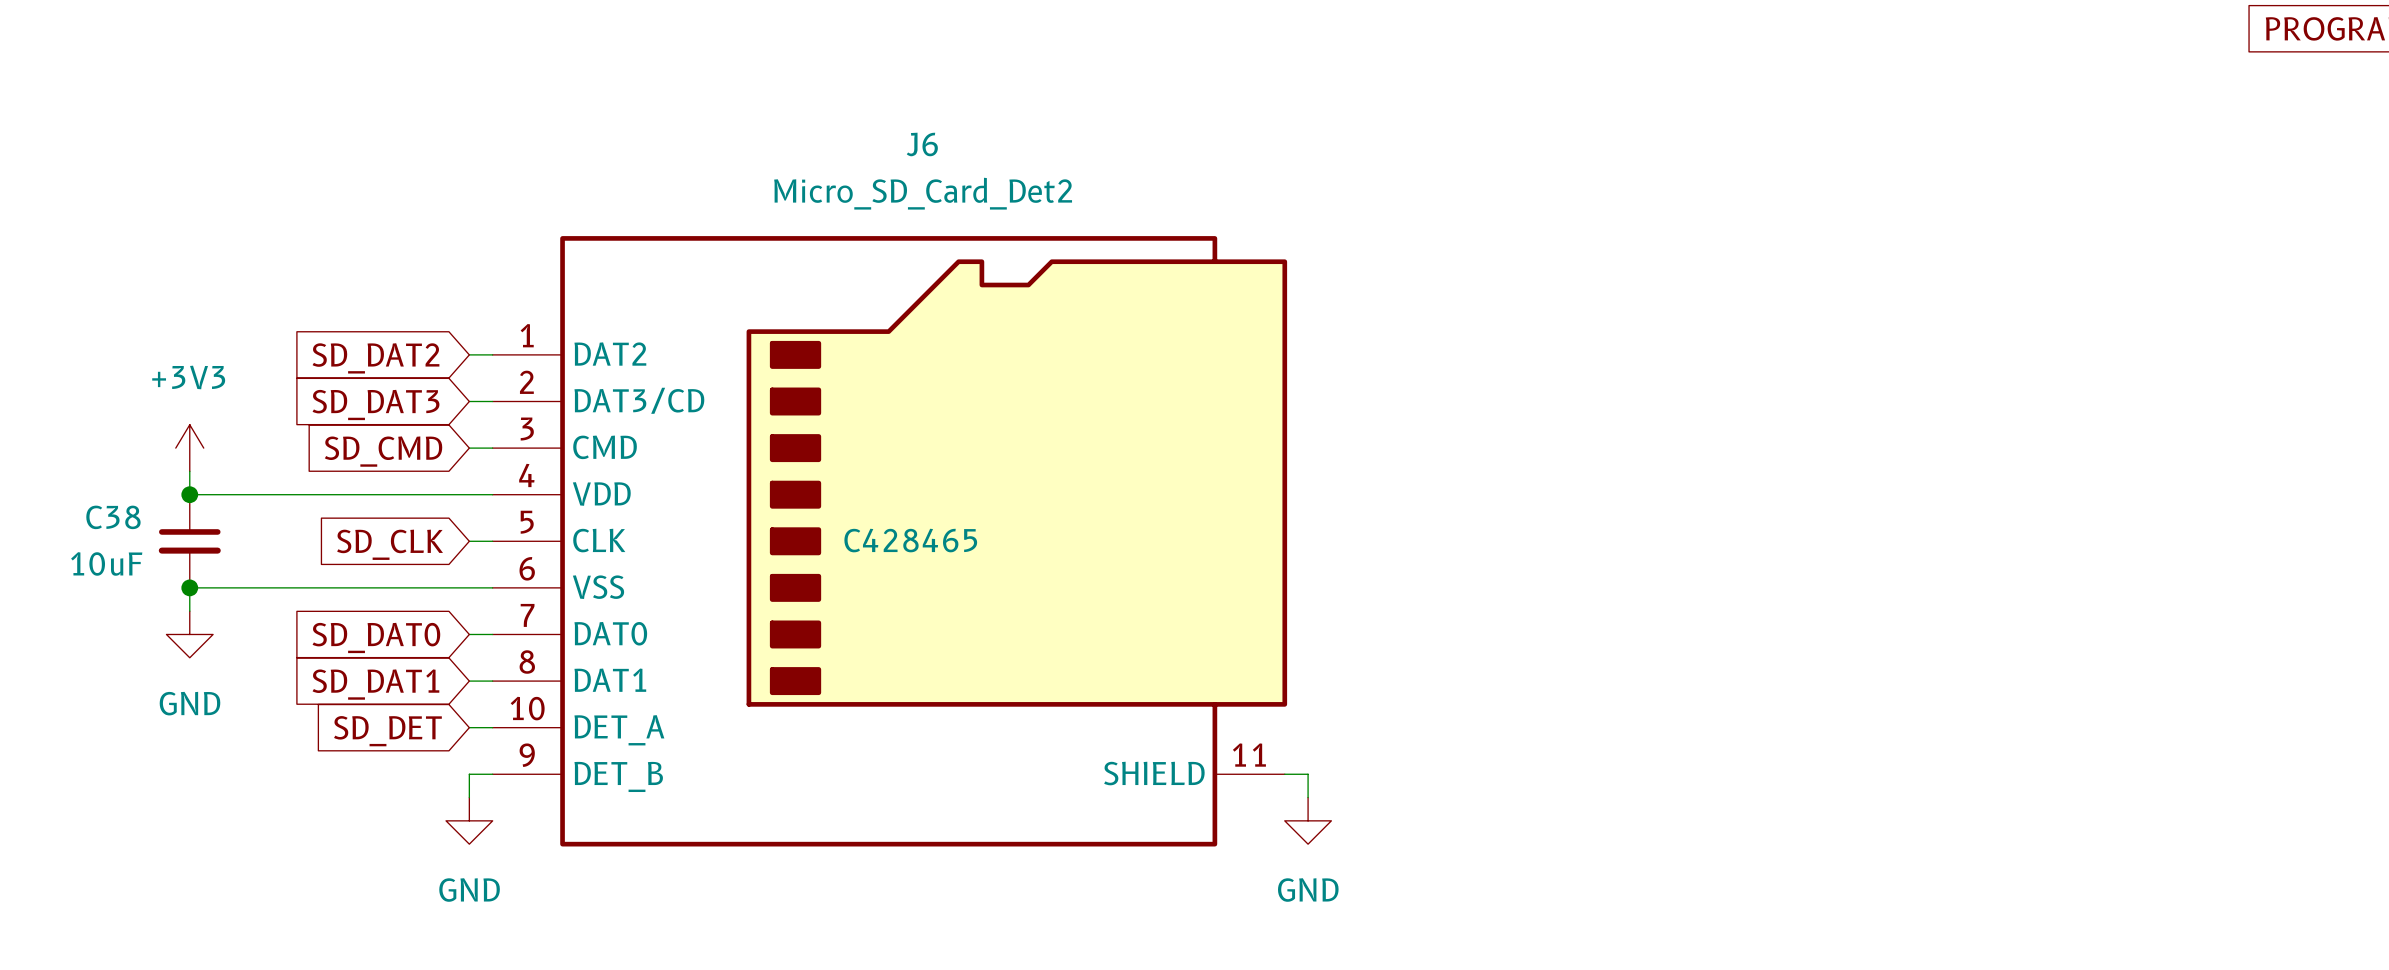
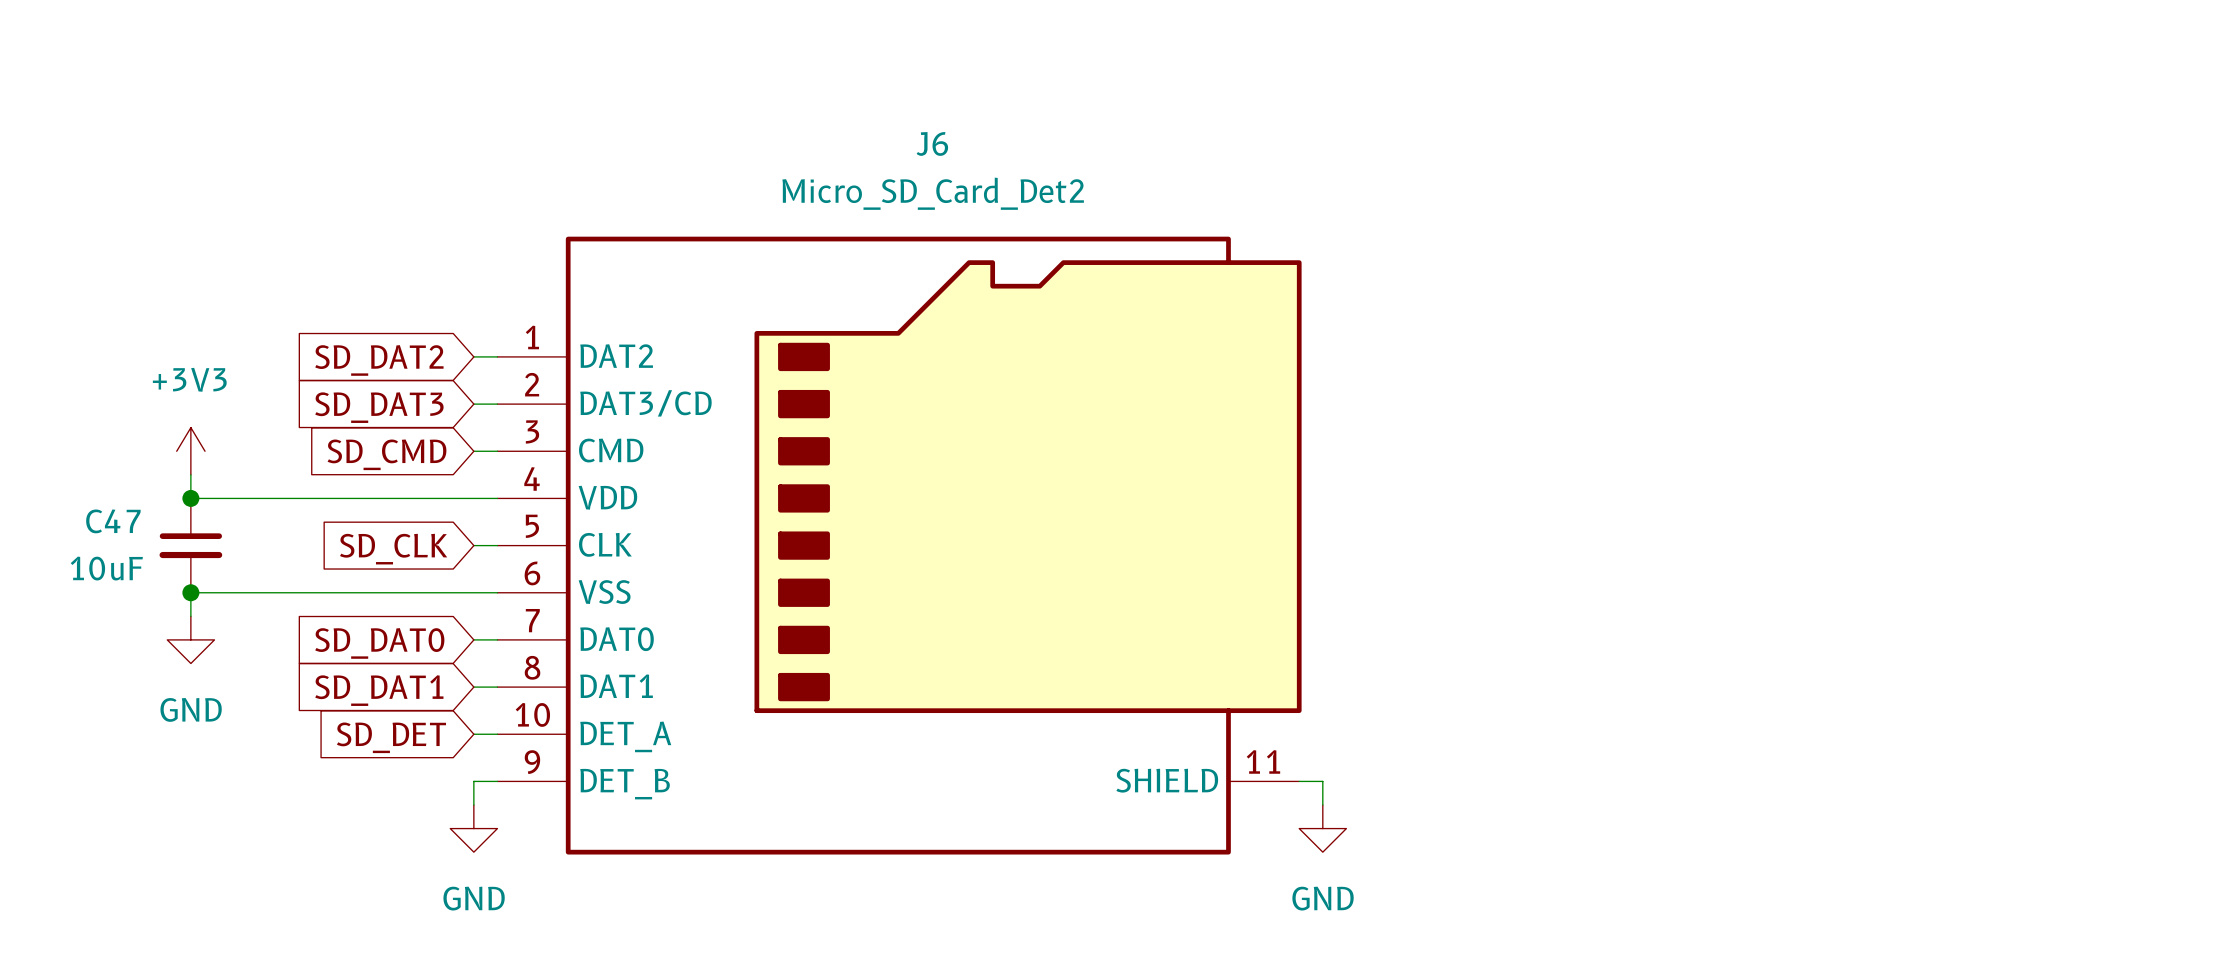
C38 name: C38 (113, 517) -> C47 (113, 521)
J6 text: C428465 (910, 540) -> none

